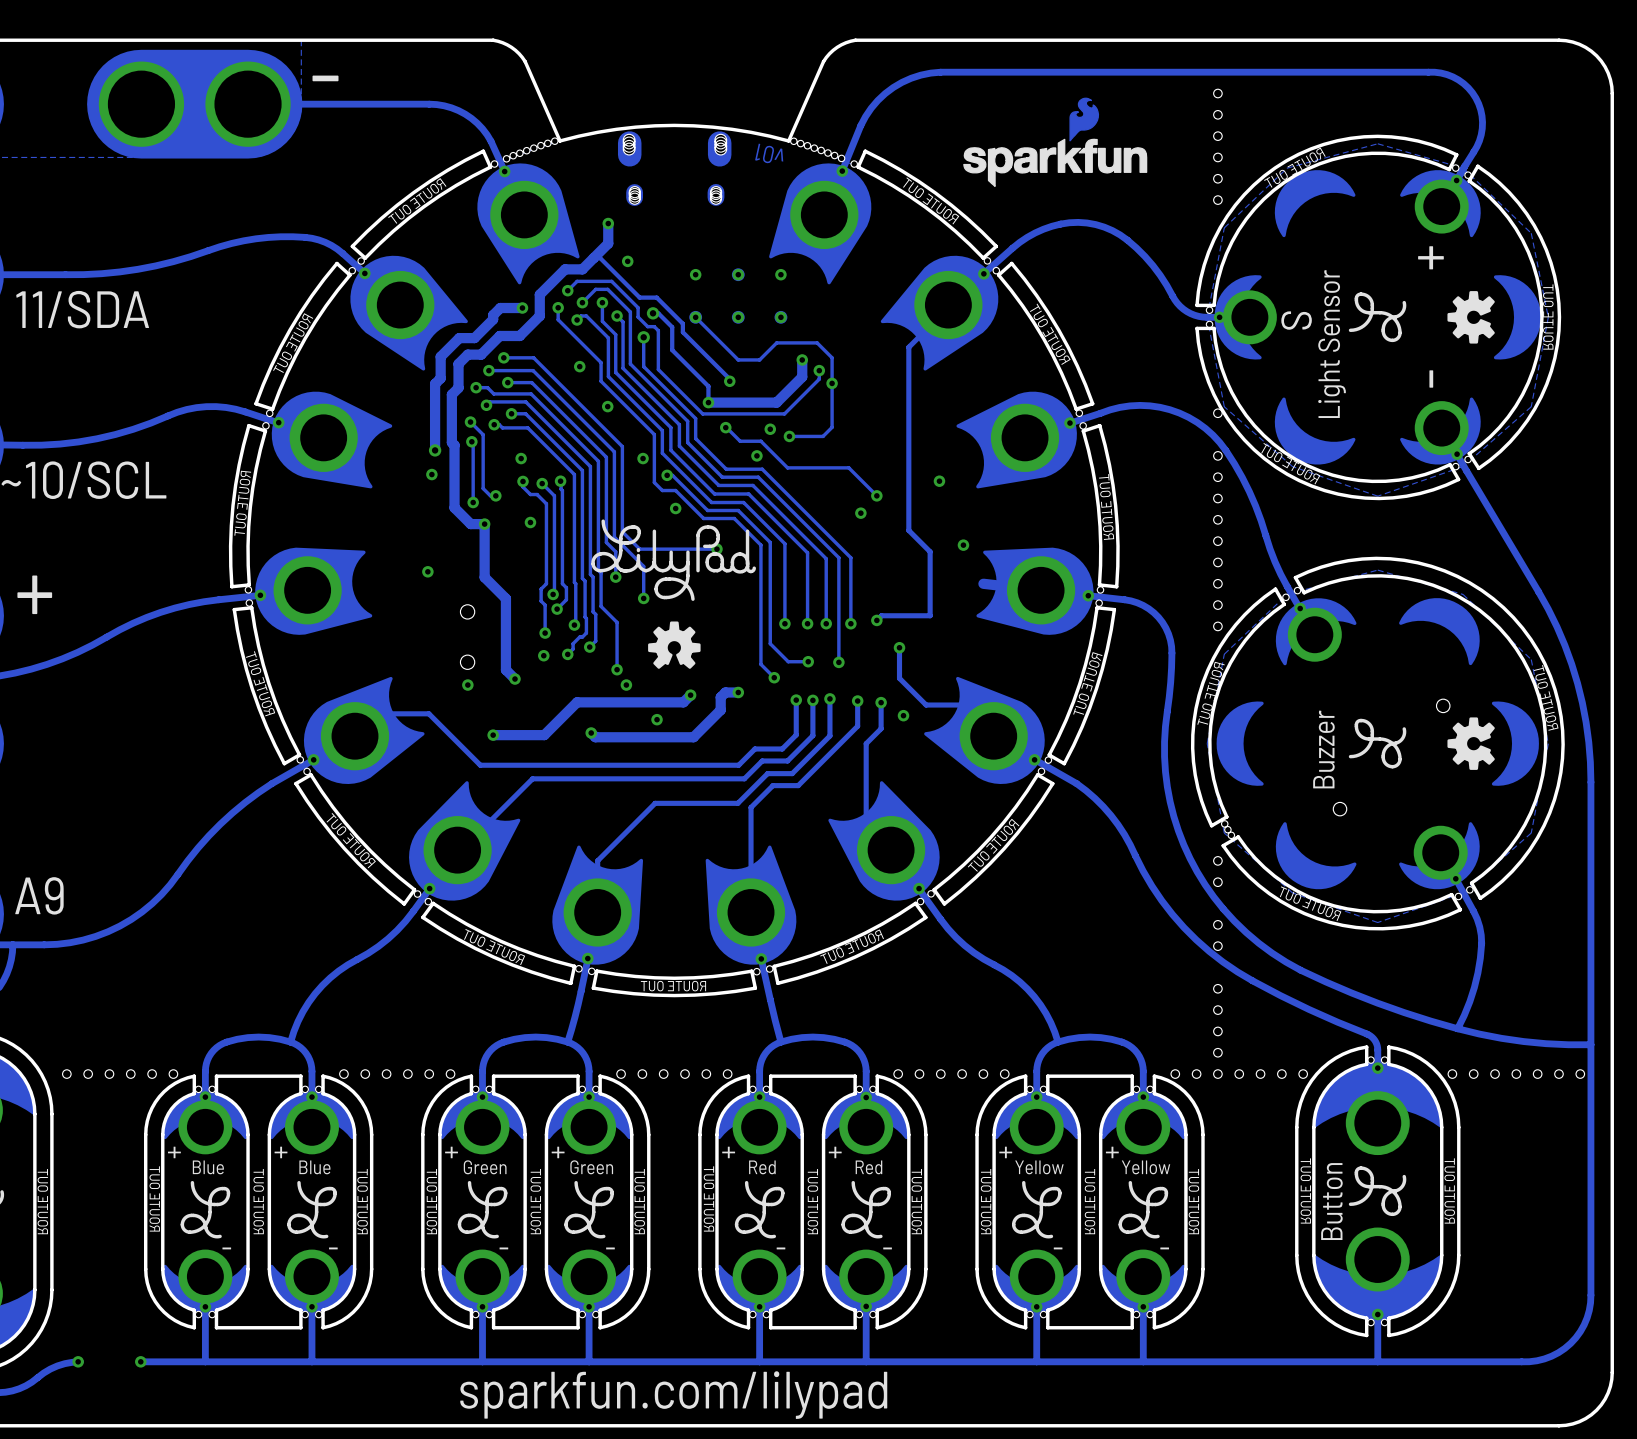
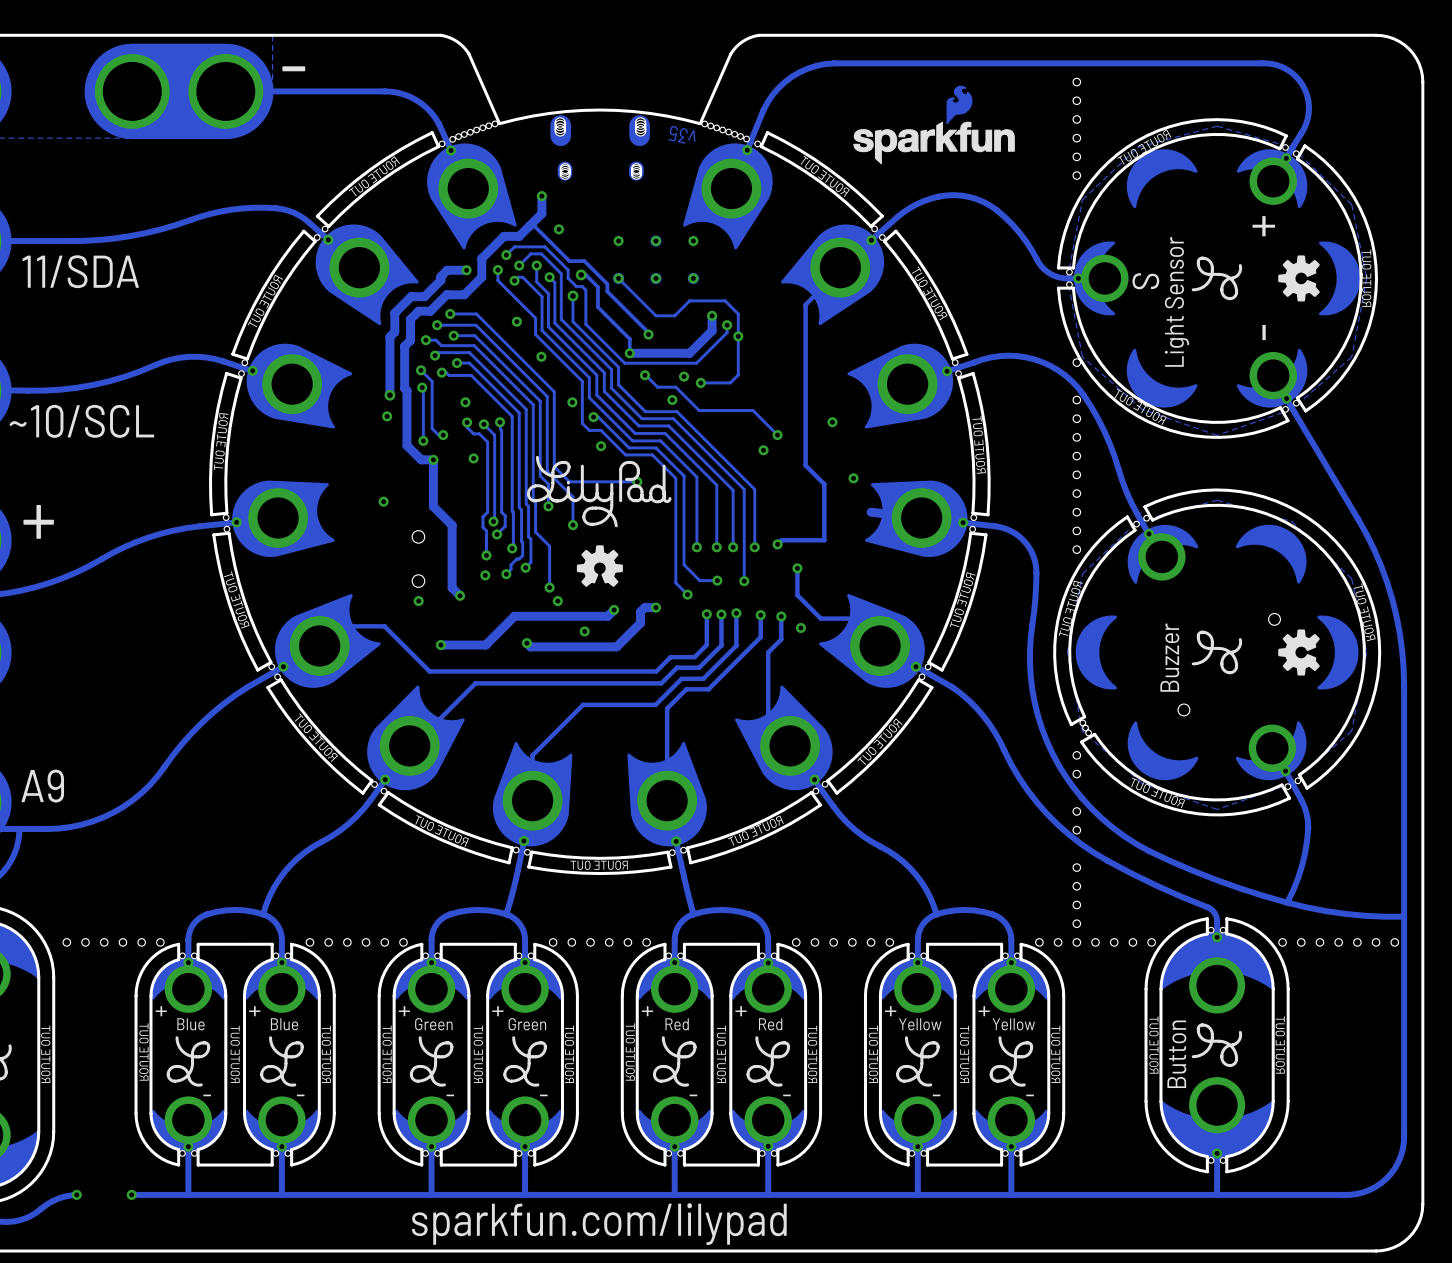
text: v01 (769, 153) -> v35 (681, 134)

